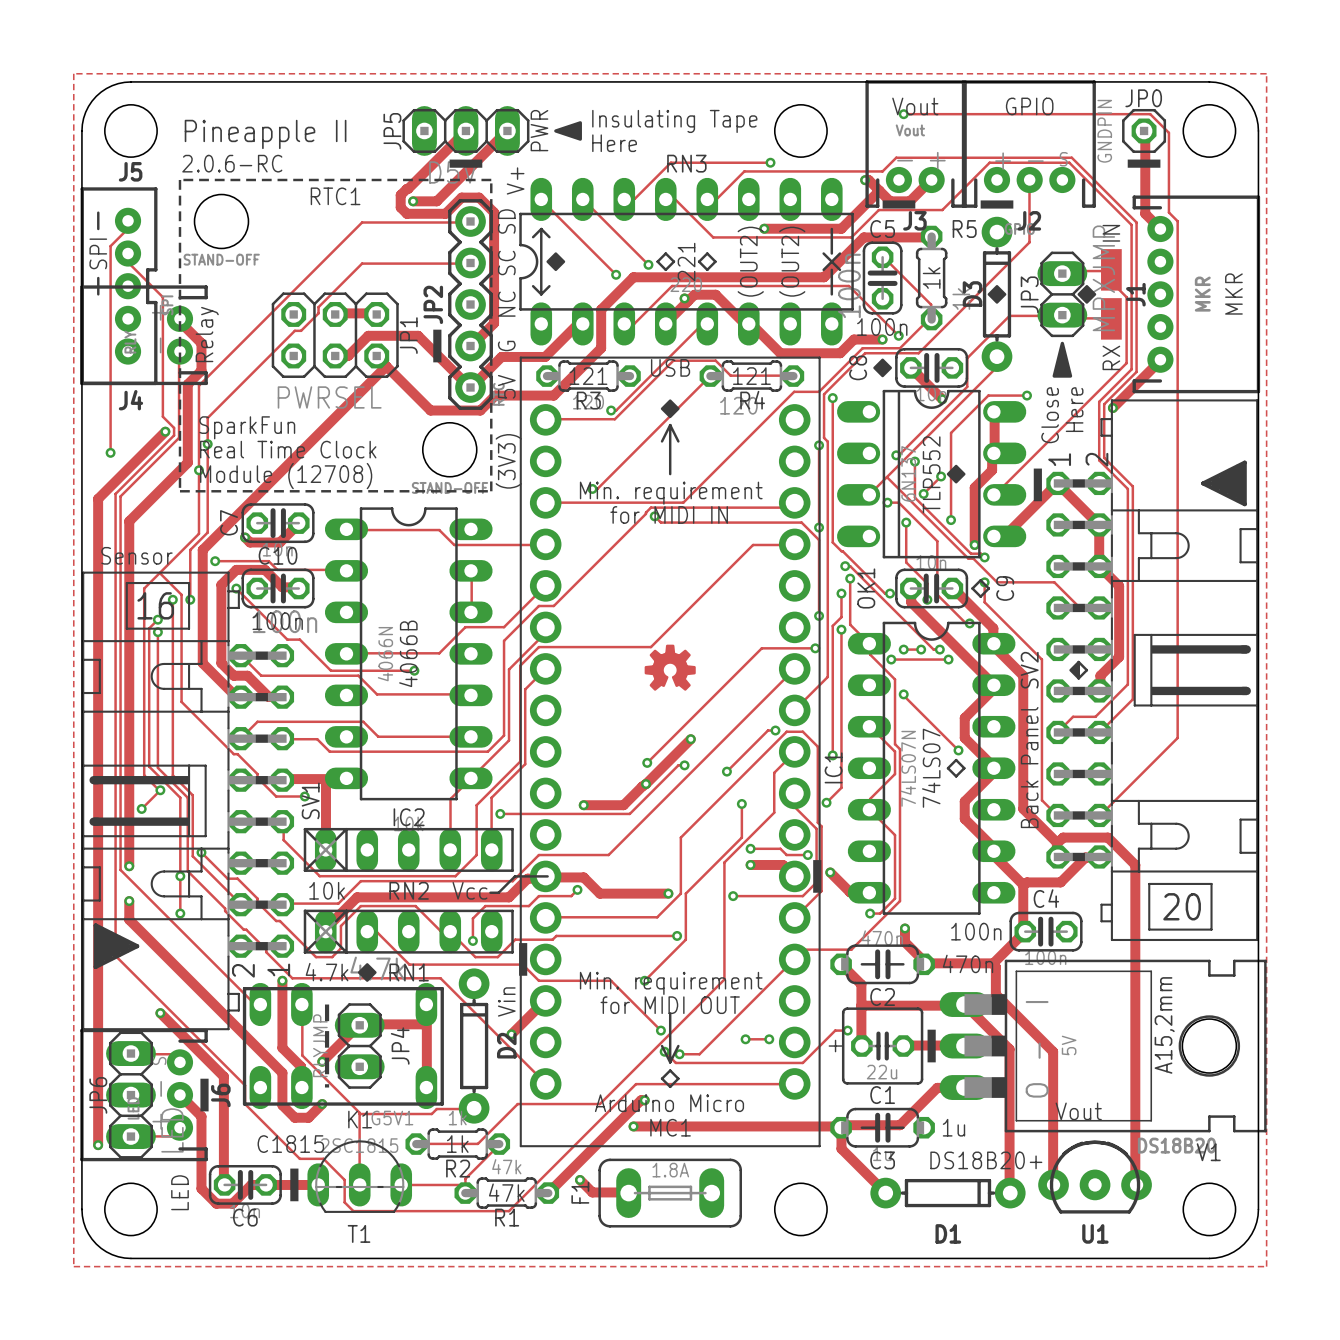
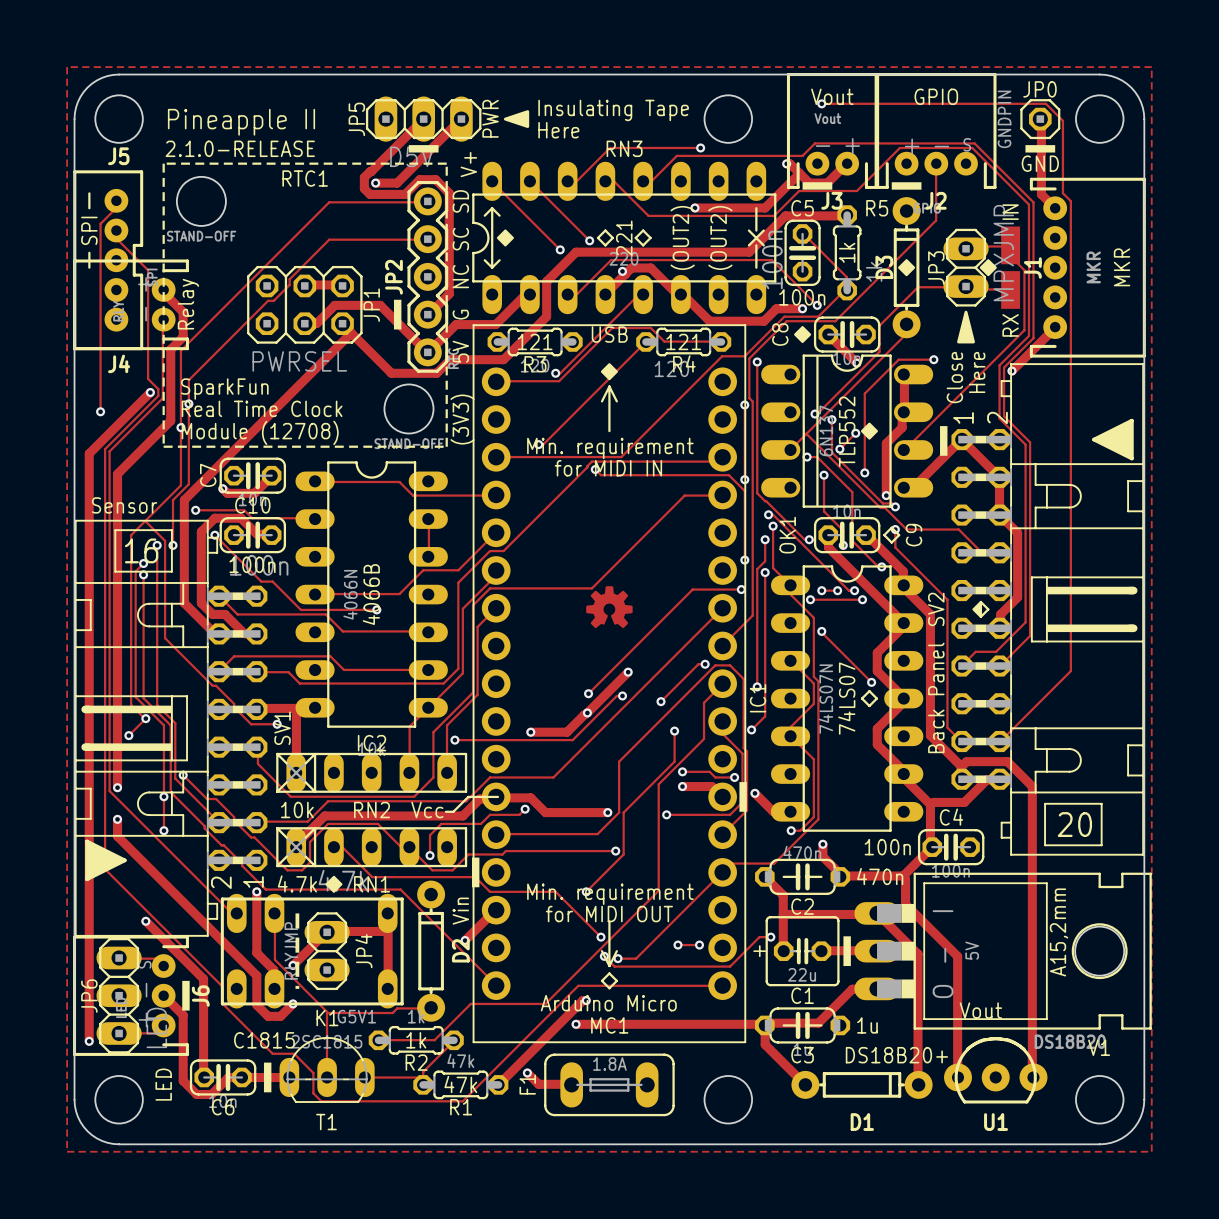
text: 2.0.6-RC (232, 163) -> 2.1.0-RELEASE (240, 148)
text: none -> GND (1040, 163)

